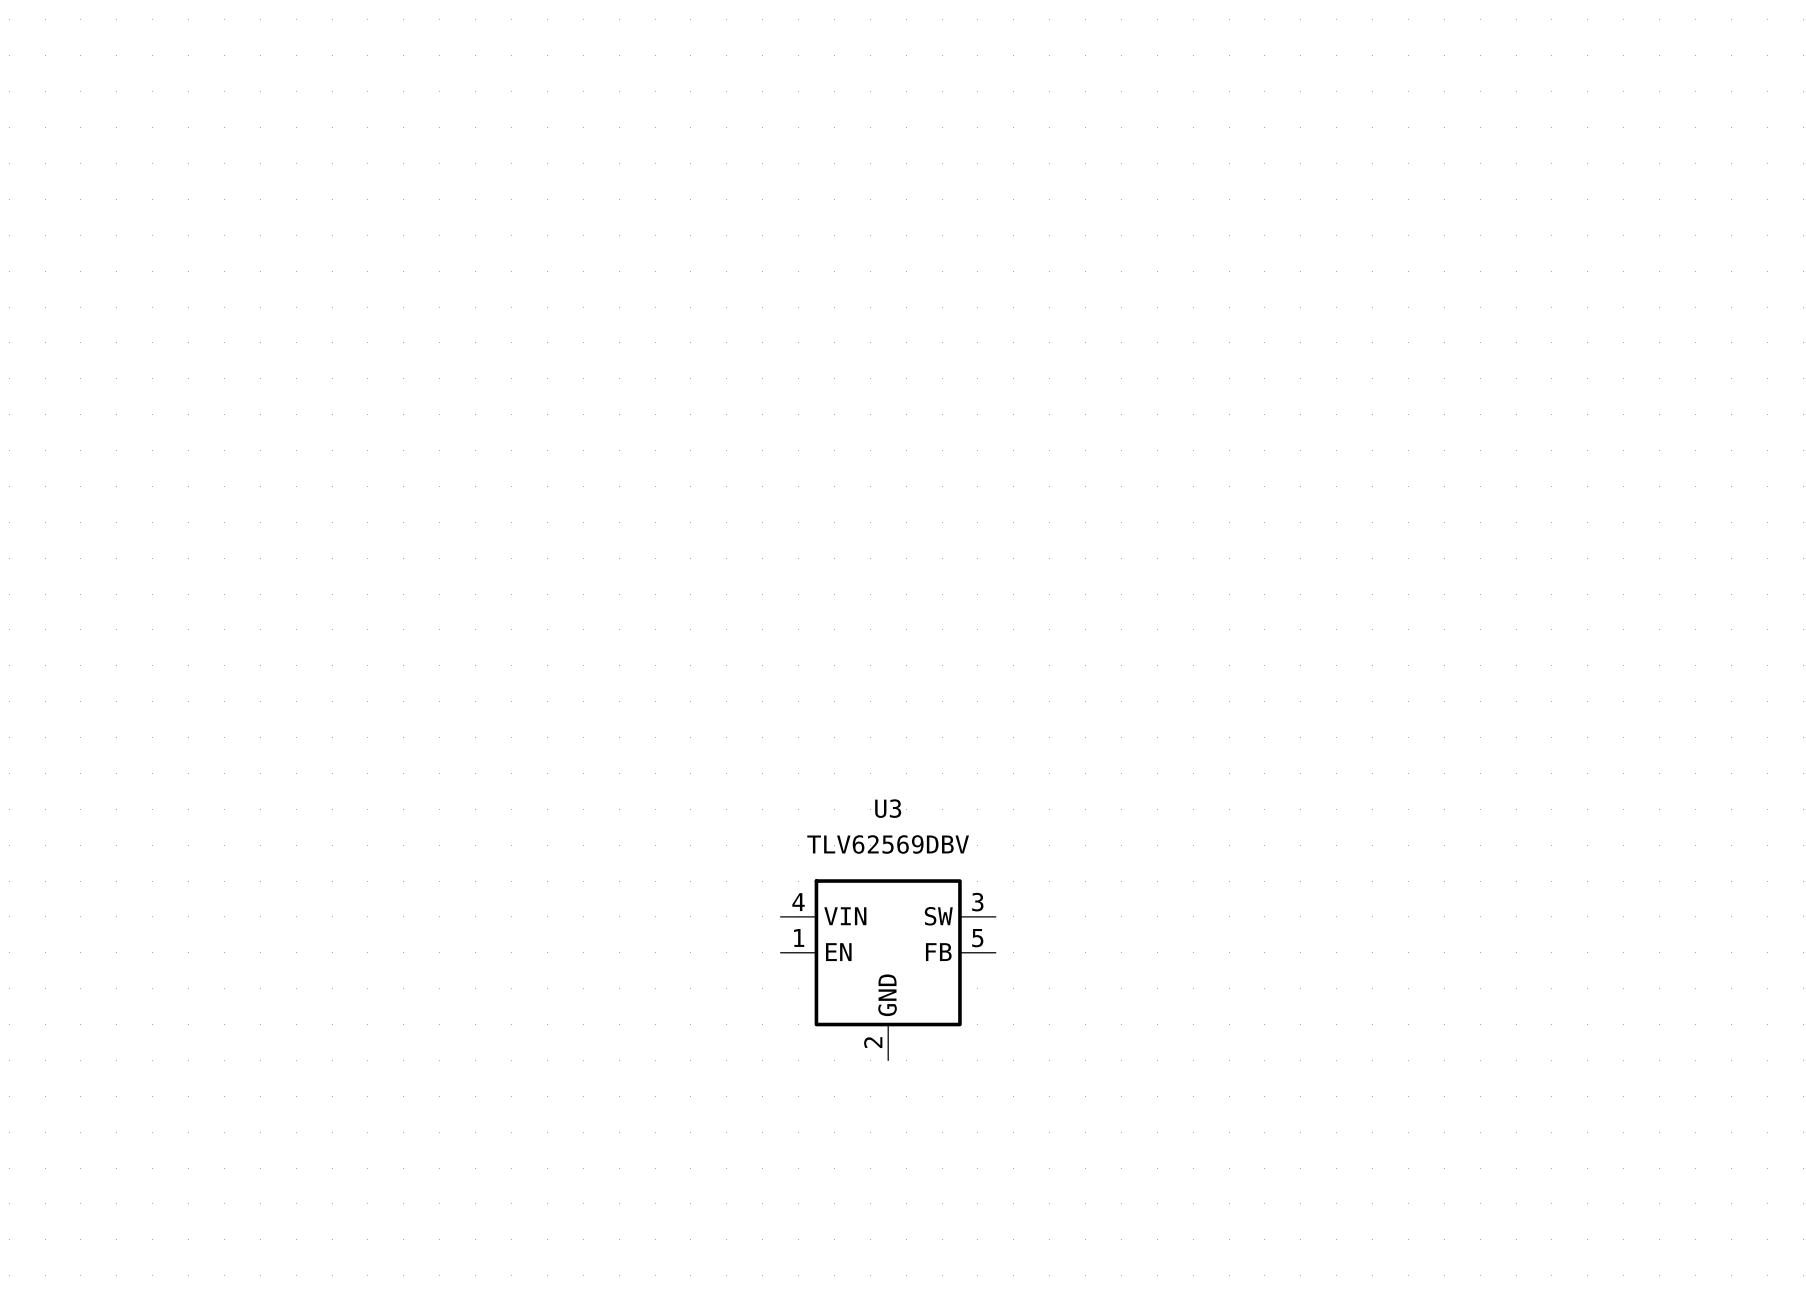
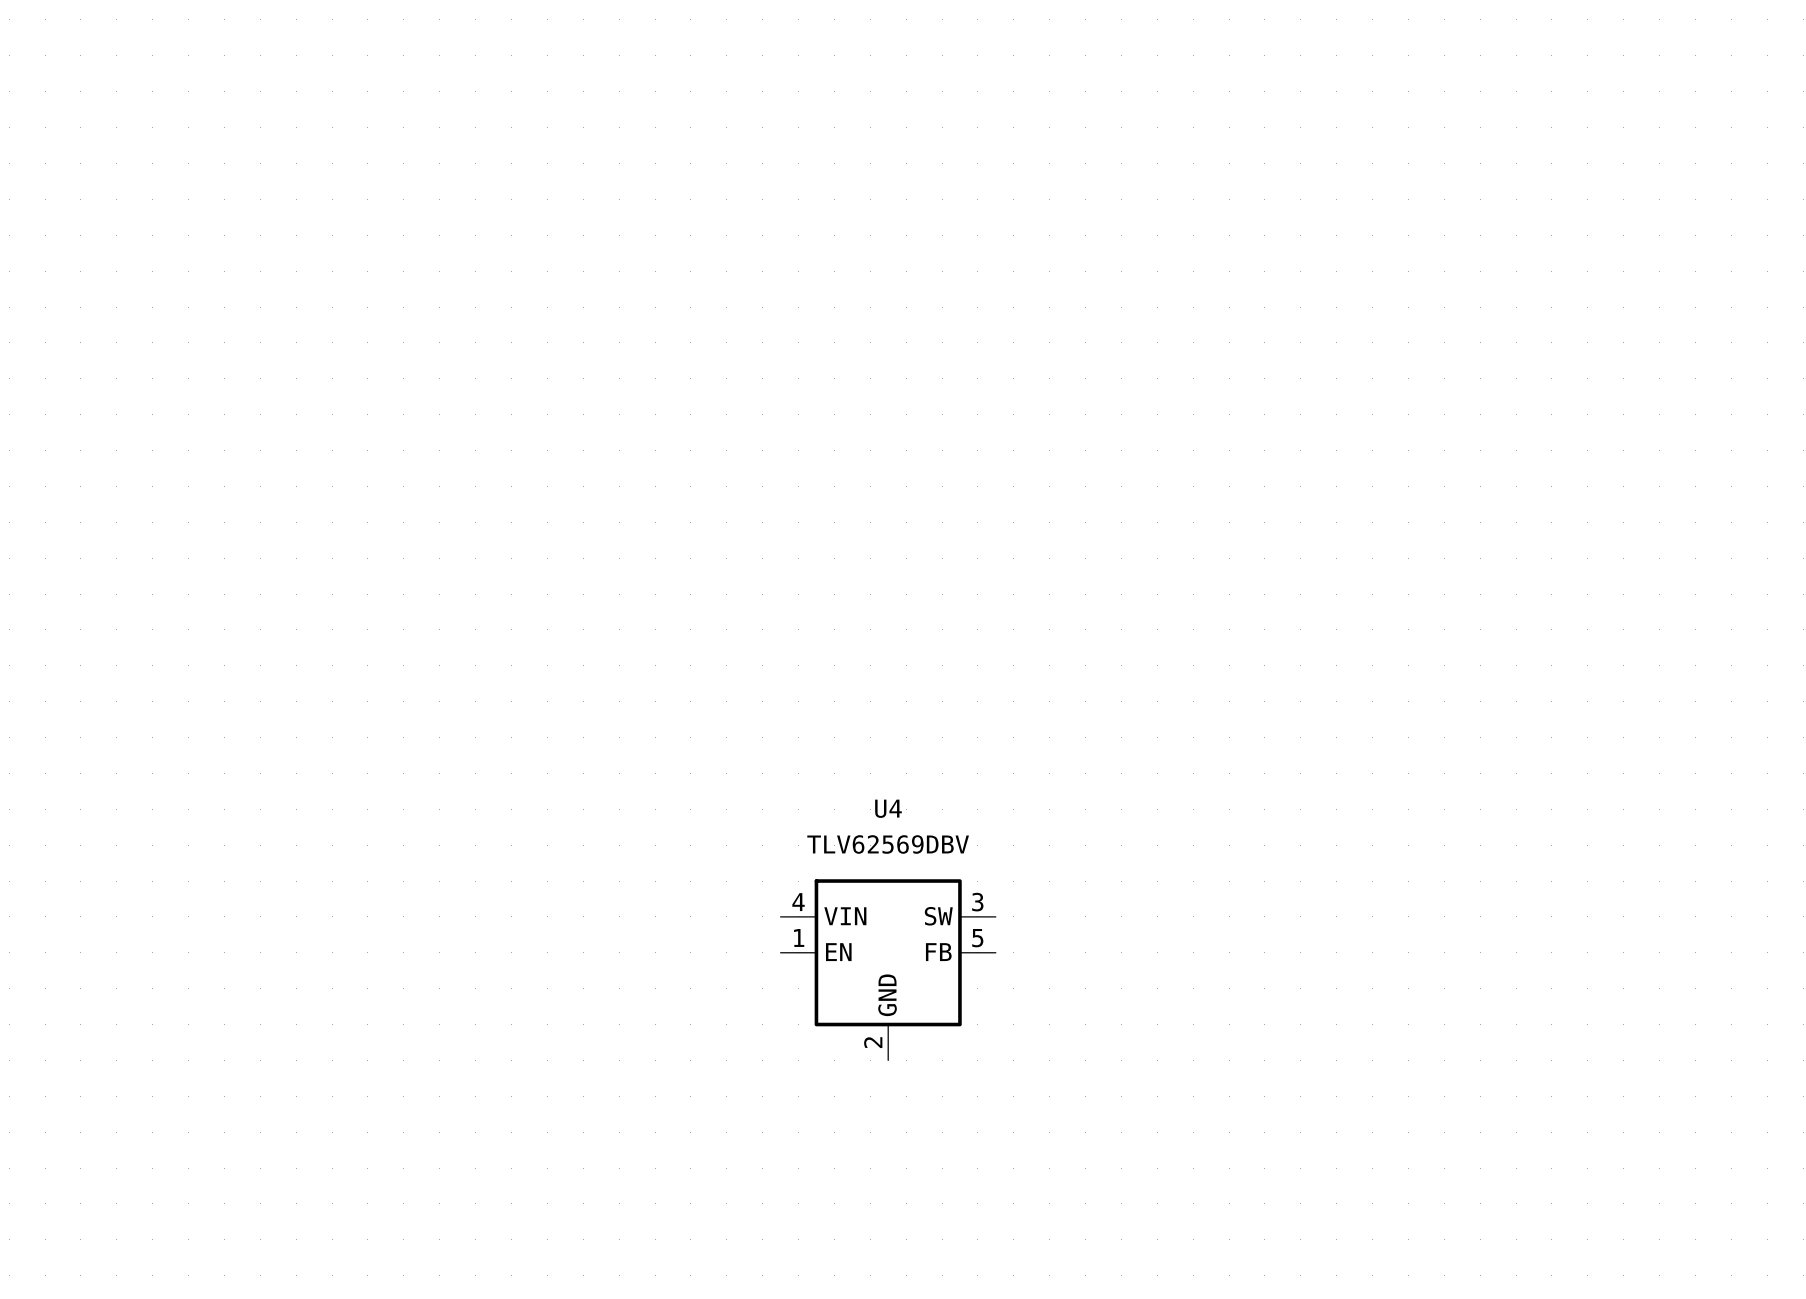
U3 name: U3 (888, 808) -> U4 (888, 808)

